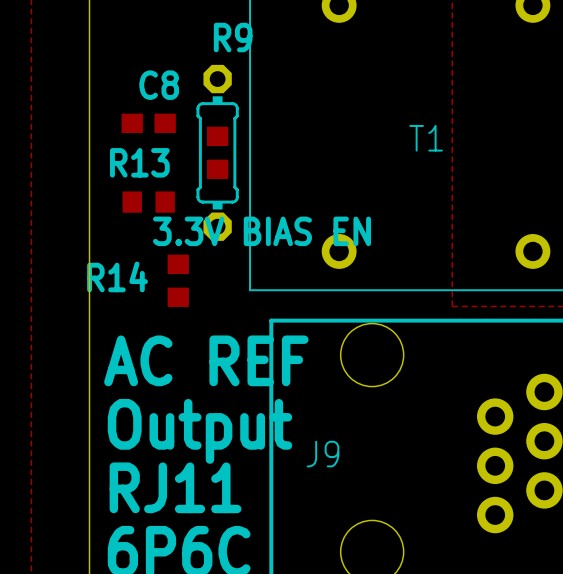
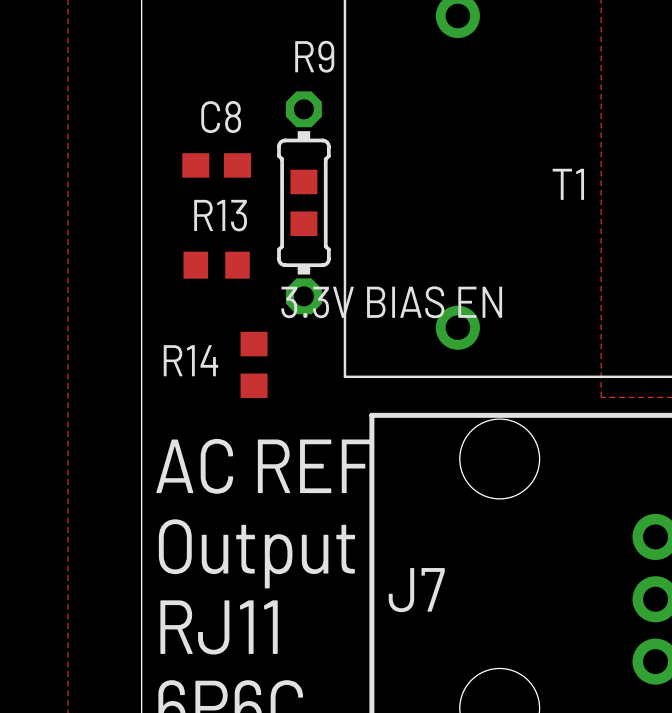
part text: J9 (323, 454) -> none
text: none -> J7 (416, 590)

